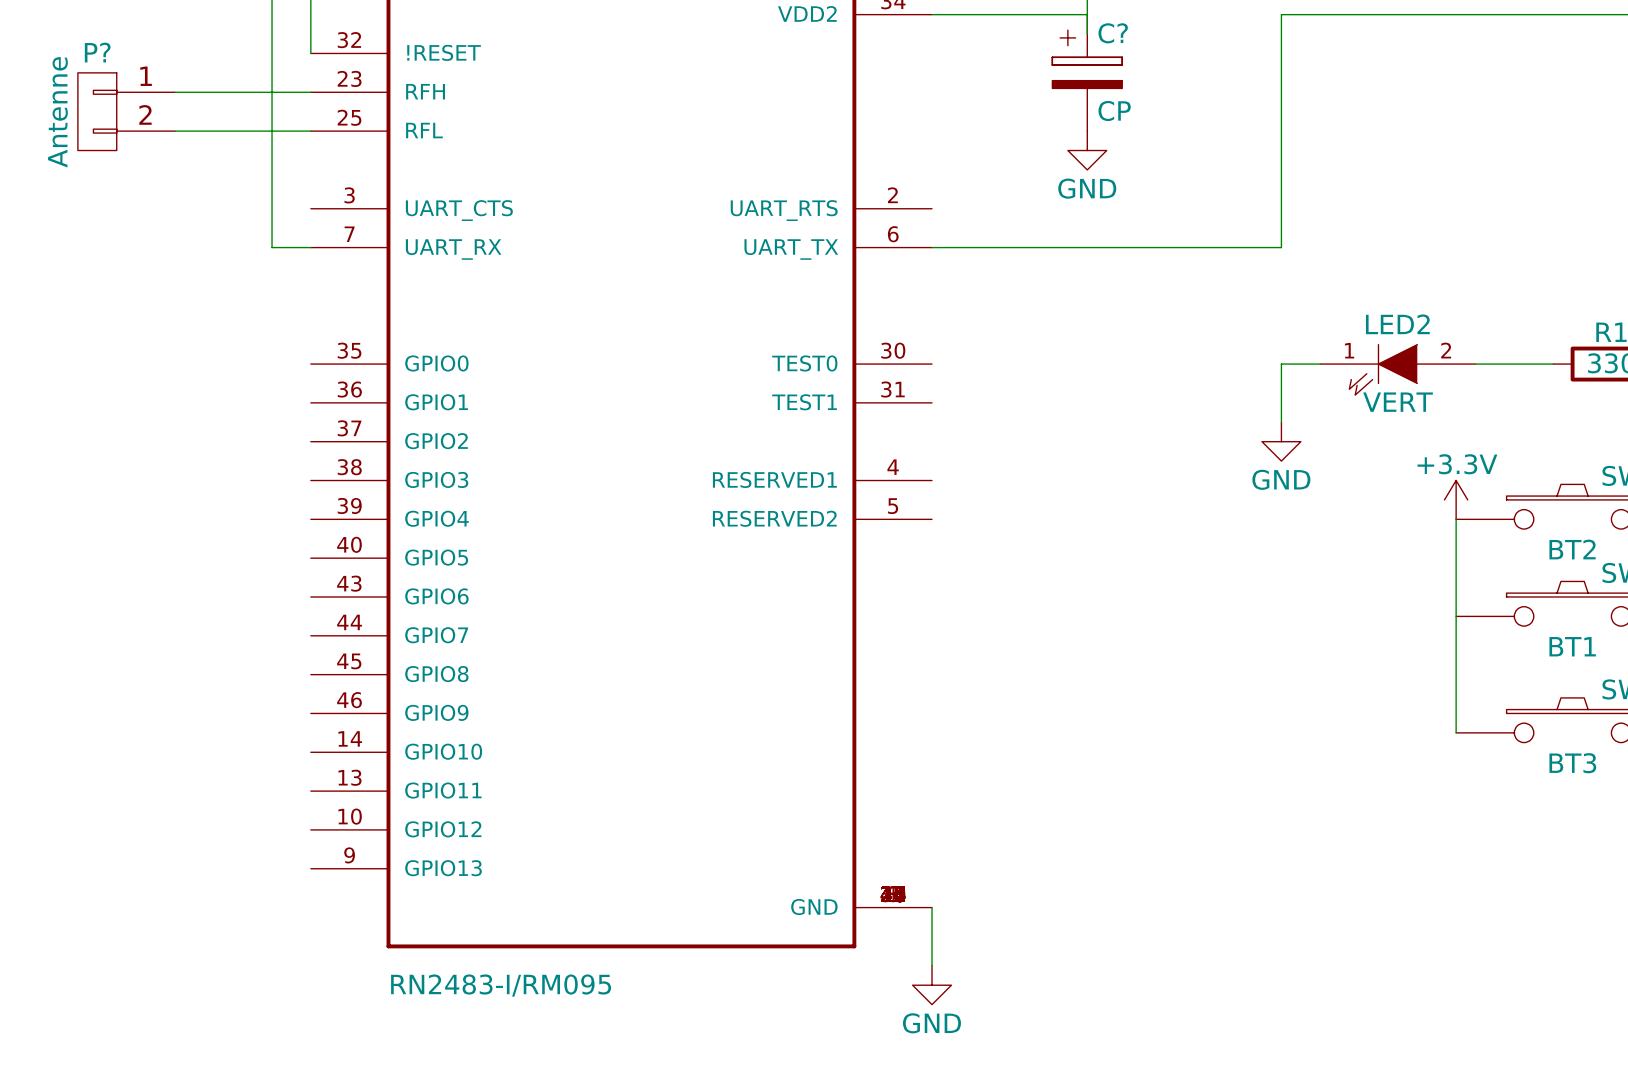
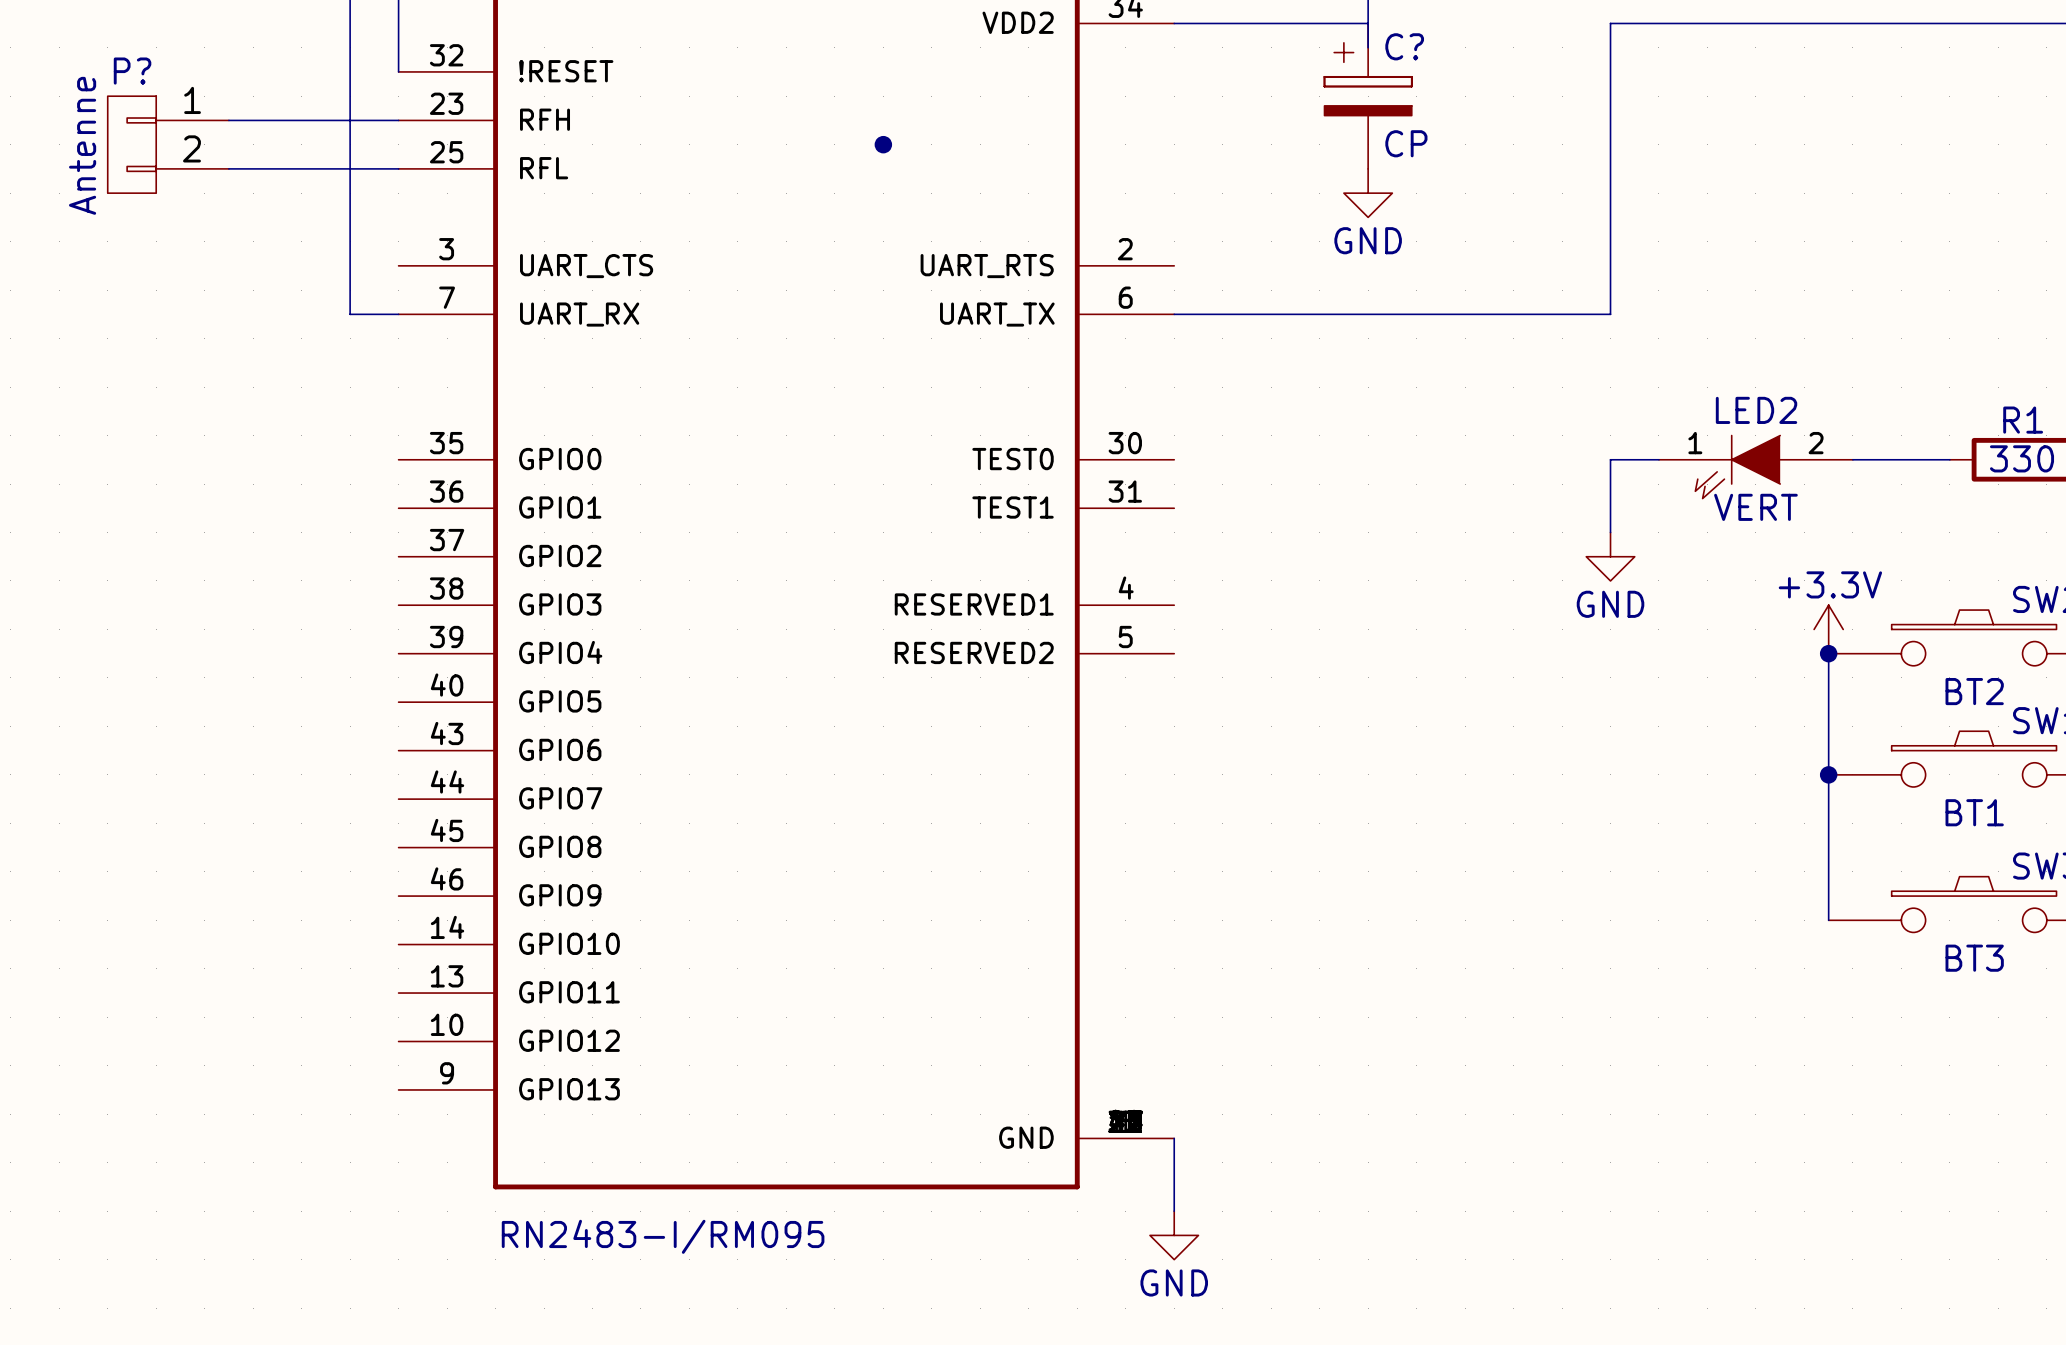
junction: none -> (883, 144)
junction: none -> (1828, 653)
junction: none -> (1828, 774)

